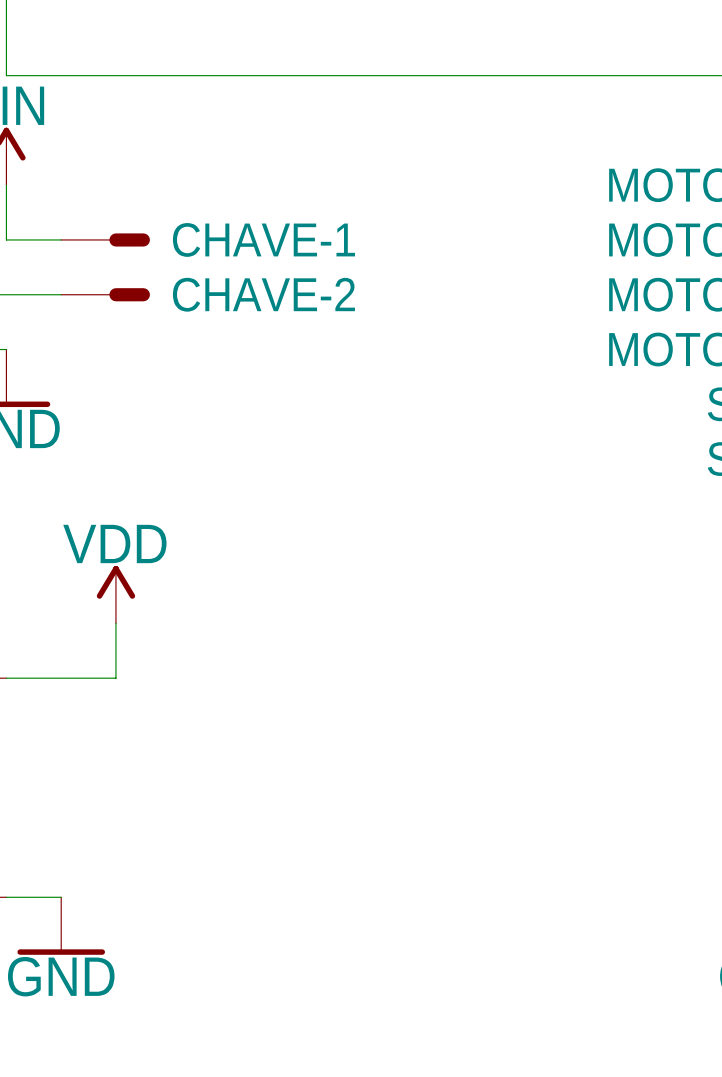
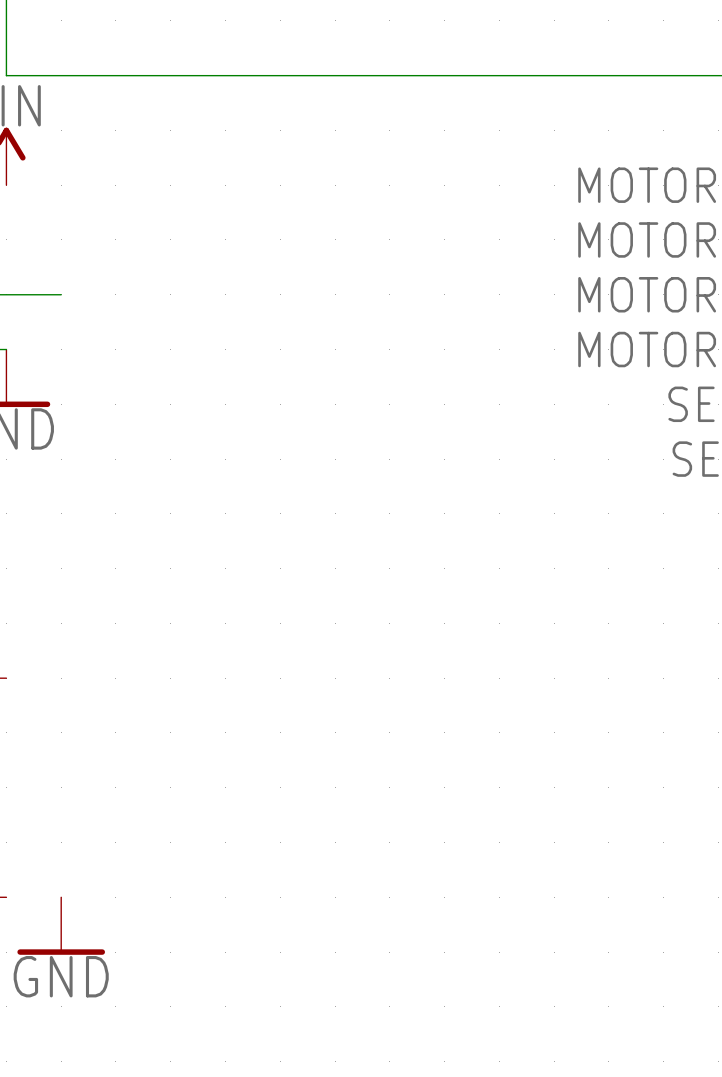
wire: (6, 185) (6, 239) (61, 239) -> none
CHAVE-1: (105, 239) -> none
CHAVE-2: (105, 294) -> none
power symbol: VDD (115, 594) -> none
wire: (115, 623) (115, 678) (6, 678) -> none
wire: (6, 897) (61, 897) -> none

